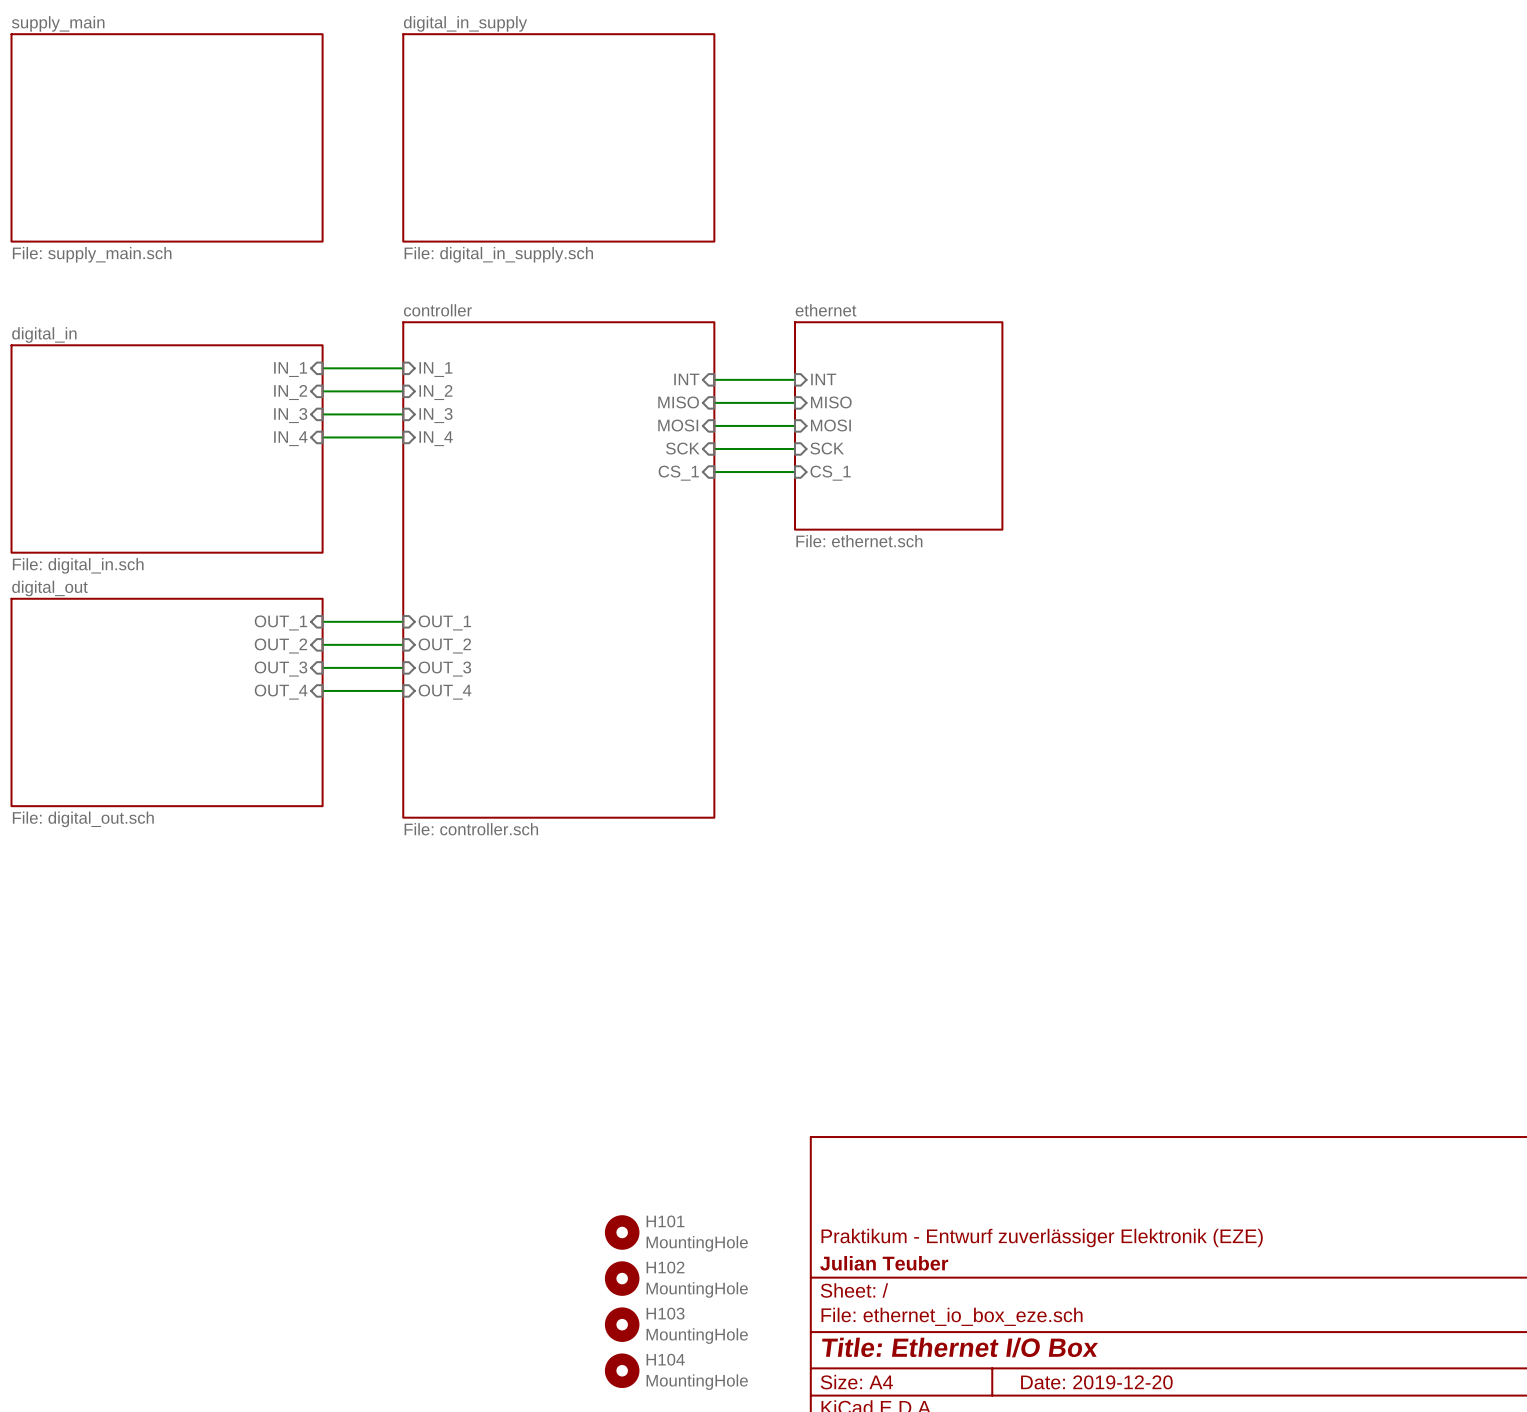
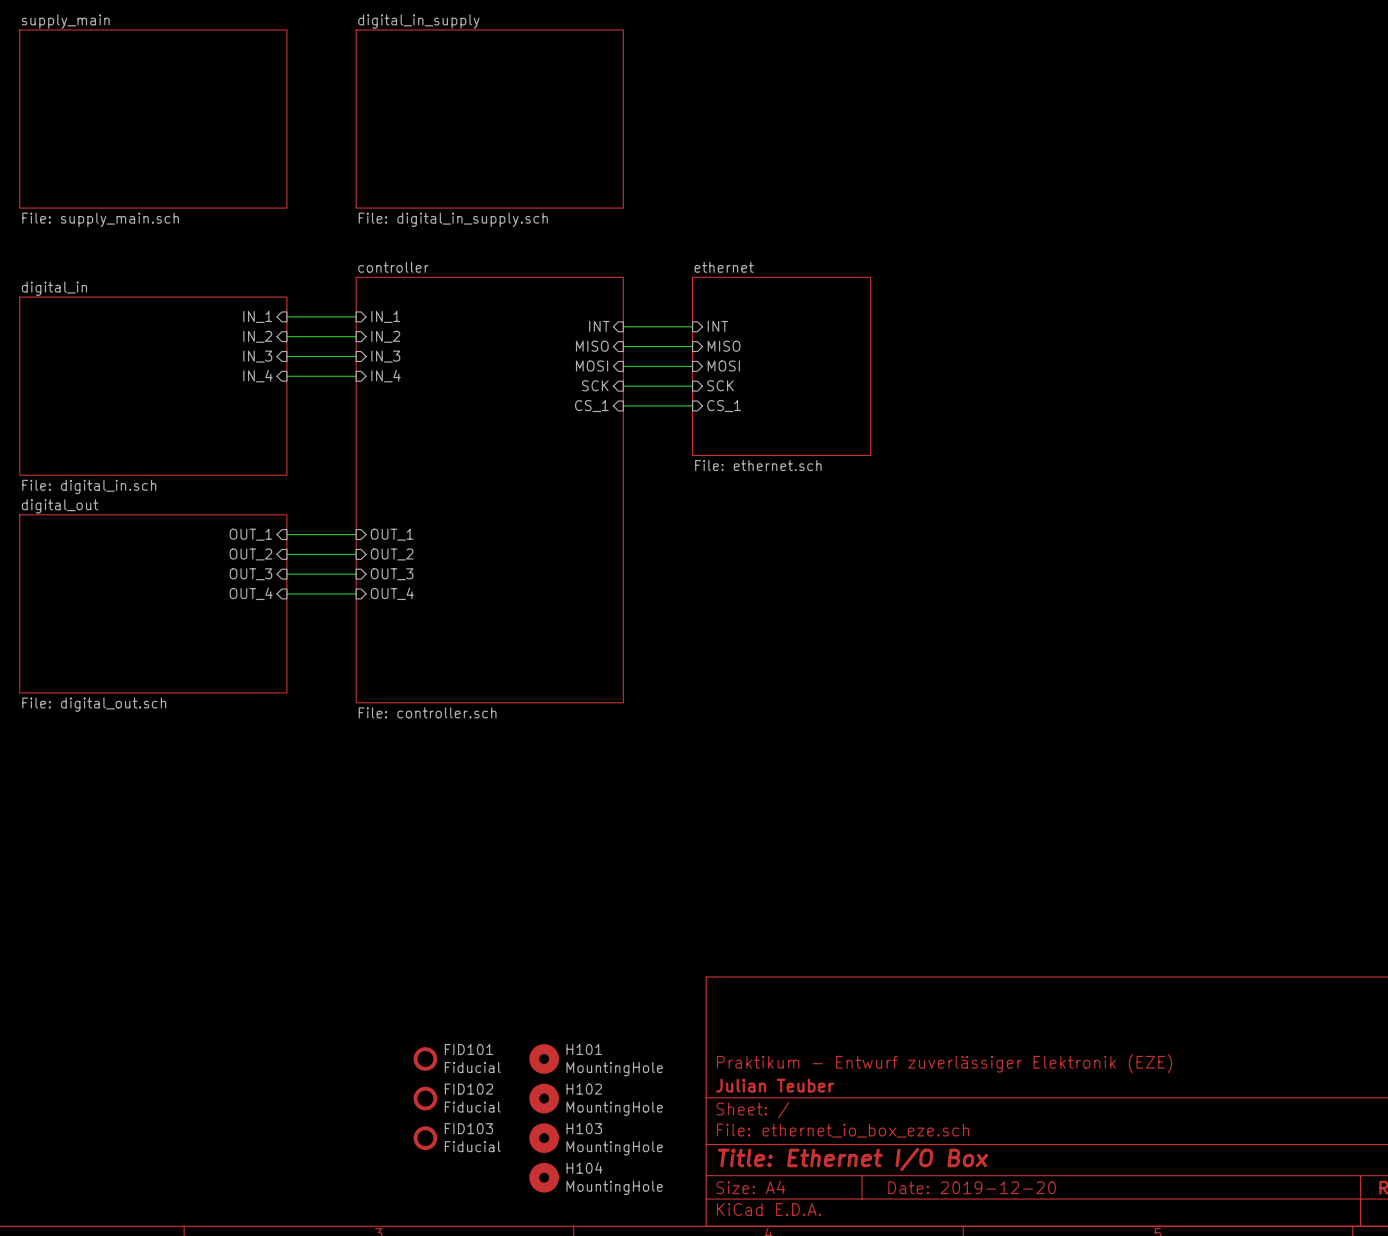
FID101: none -> Fiducial (425, 1058)
FID102: none -> Fiducial (425, 1098)
FID103: none -> Fiducial (425, 1138)

